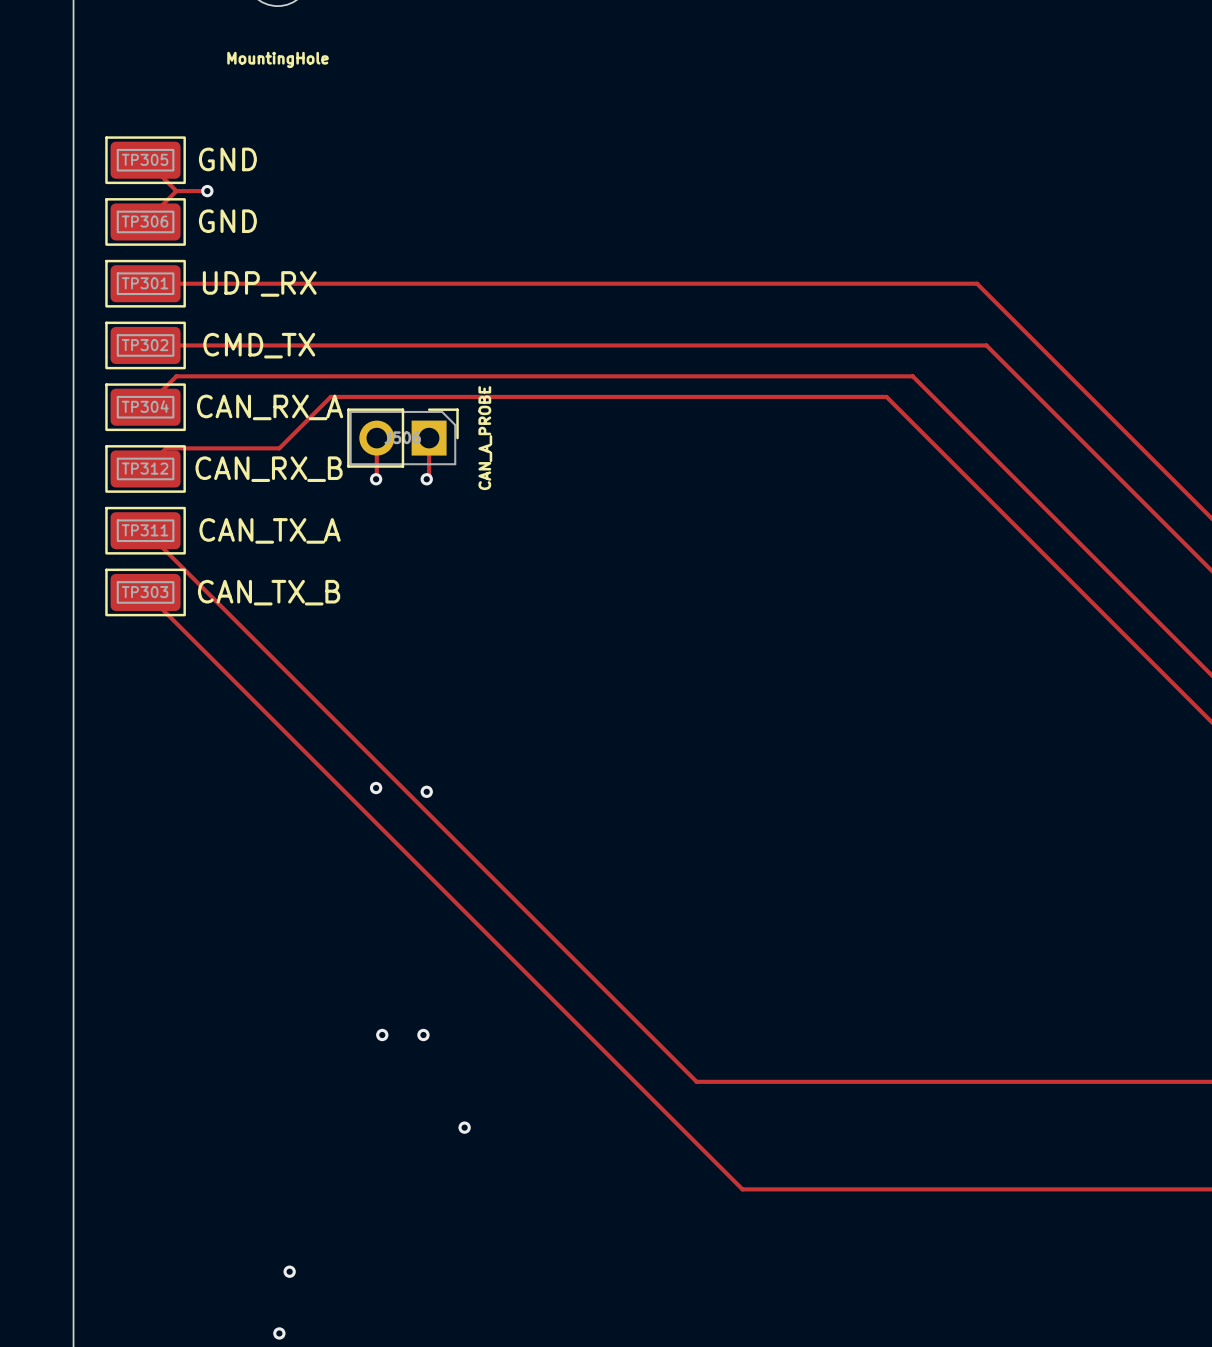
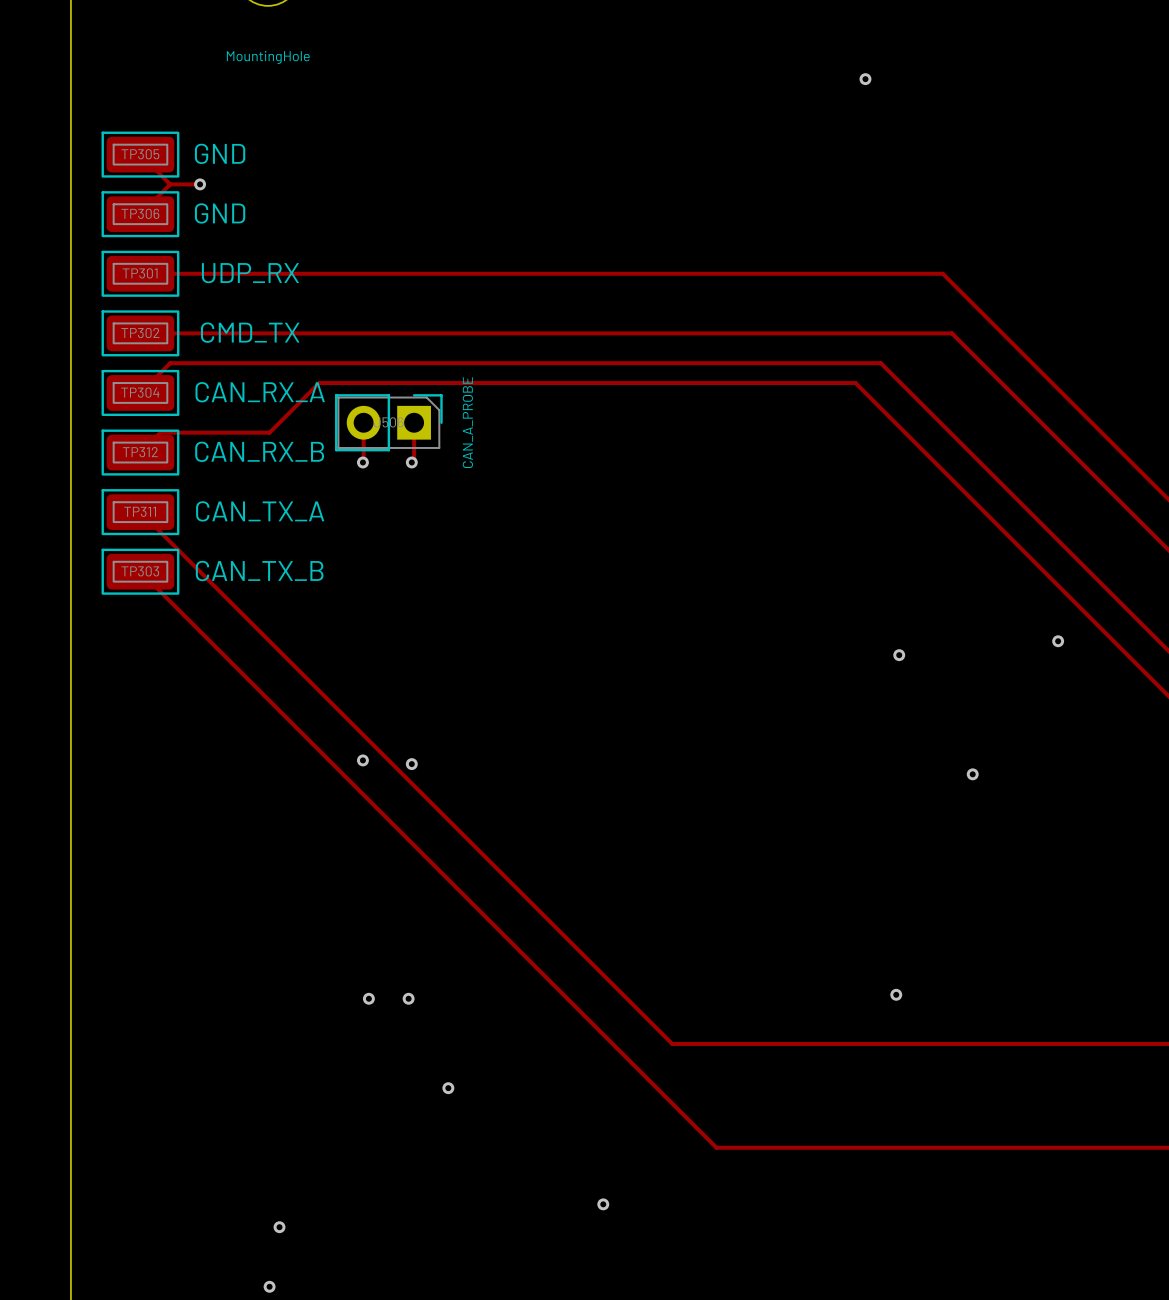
via: none -> (865, 79)
via: none -> (1058, 641)
via: none -> (899, 655)
via: none -> (972, 774)
via: none -> (896, 994)
via: none -> (603, 1204)

